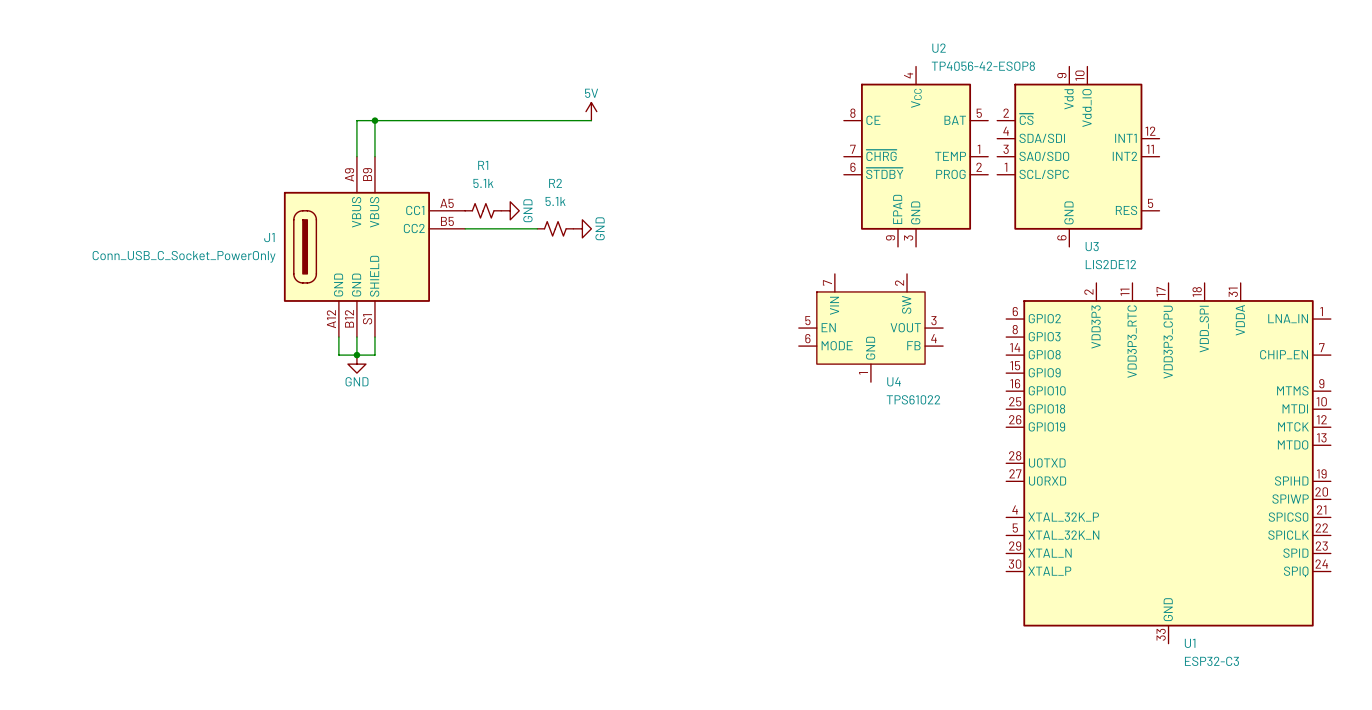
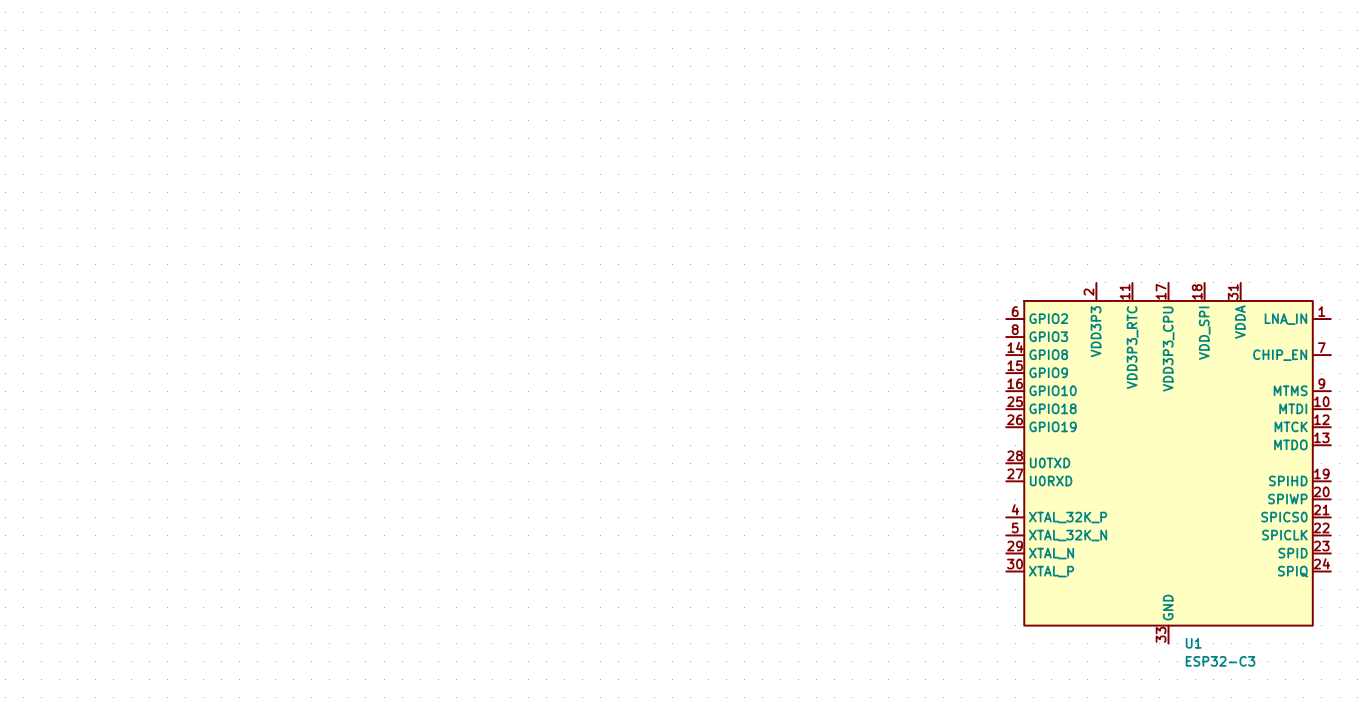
power symbol: 5V (591, 111) -> none
wire: (374, 120) (374, 156) -> none
junction: (374, 120) -> none
wire: (591, 120) (356, 120) (356, 156) -> none
U2: TP4056-42-ESOP8 (916, 156) -> none
U3: LIS2DE12 (1078, 156) -> none
R1: 5.1k (483, 210) -> none
power symbol: GND (510, 210) -> none
wire: (465, 228) (537, 228) -> none
R2: 5.1k (555, 228) -> none
power symbol: GND (582, 228) -> none
J1: Conn_USB_C_Socket_PowerOnly (374, 246) -> none
U4: TPS61022 (870, 328) -> none
wire: (338, 337) (338, 355) (374, 355) (374, 337) -> none
wire: (356, 337) (356, 355) -> none
junction: (356, 355) -> none
power symbol: GND (356, 364) -> none

